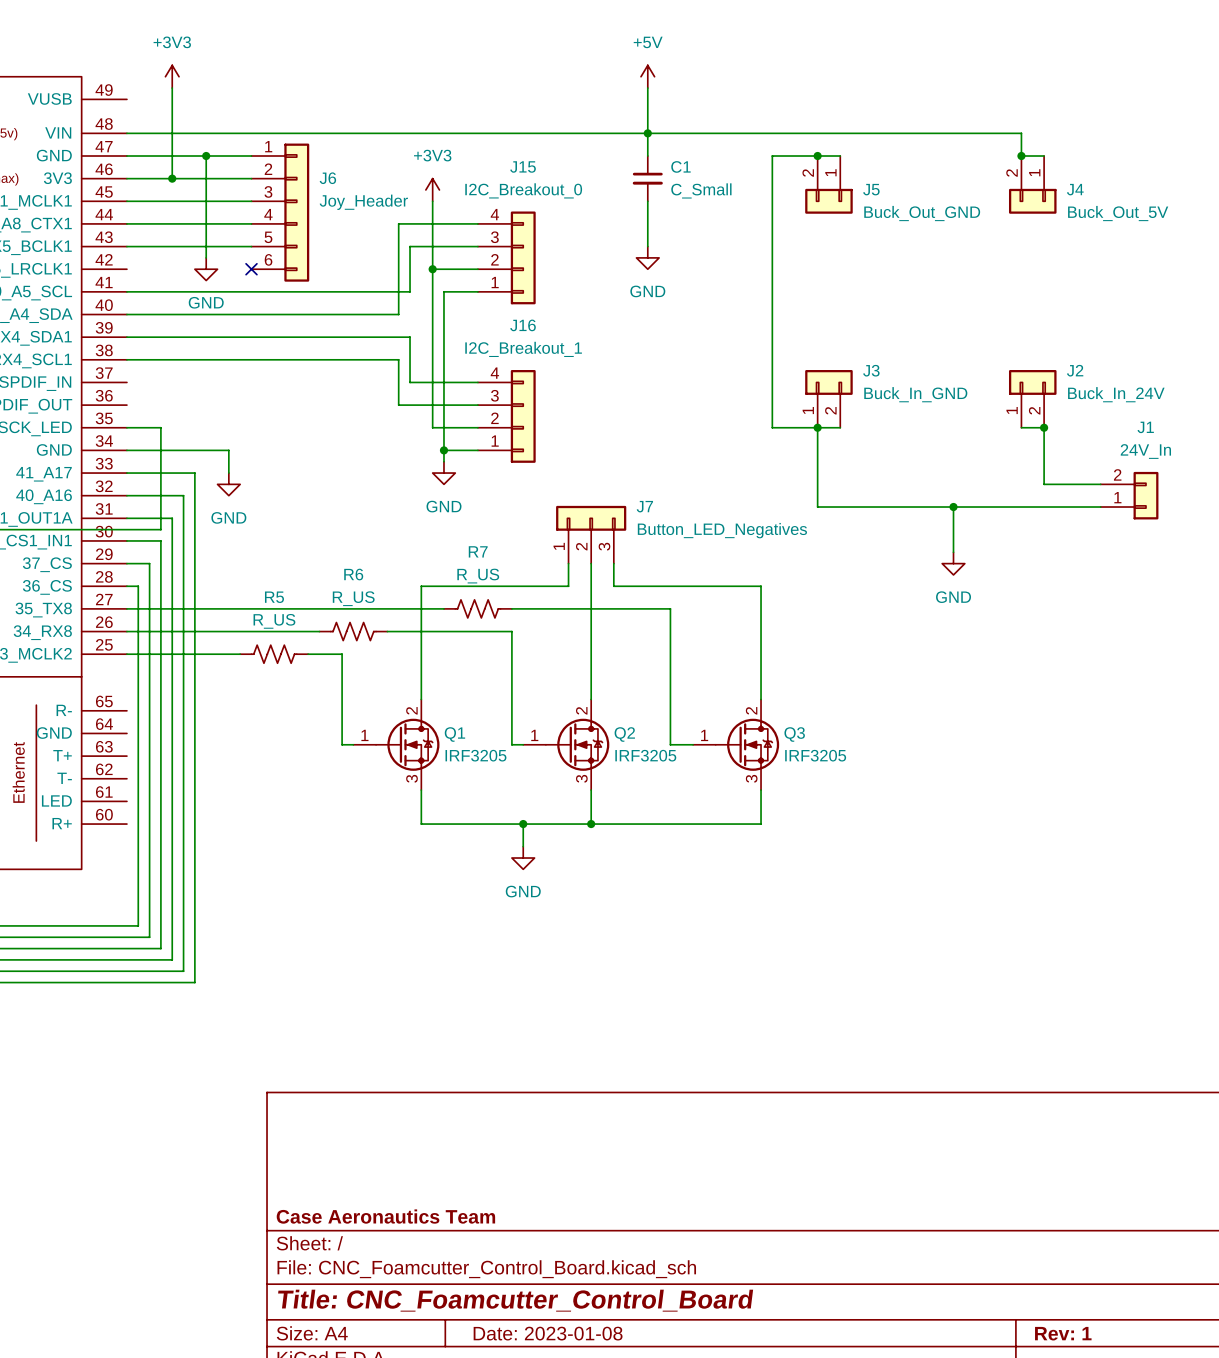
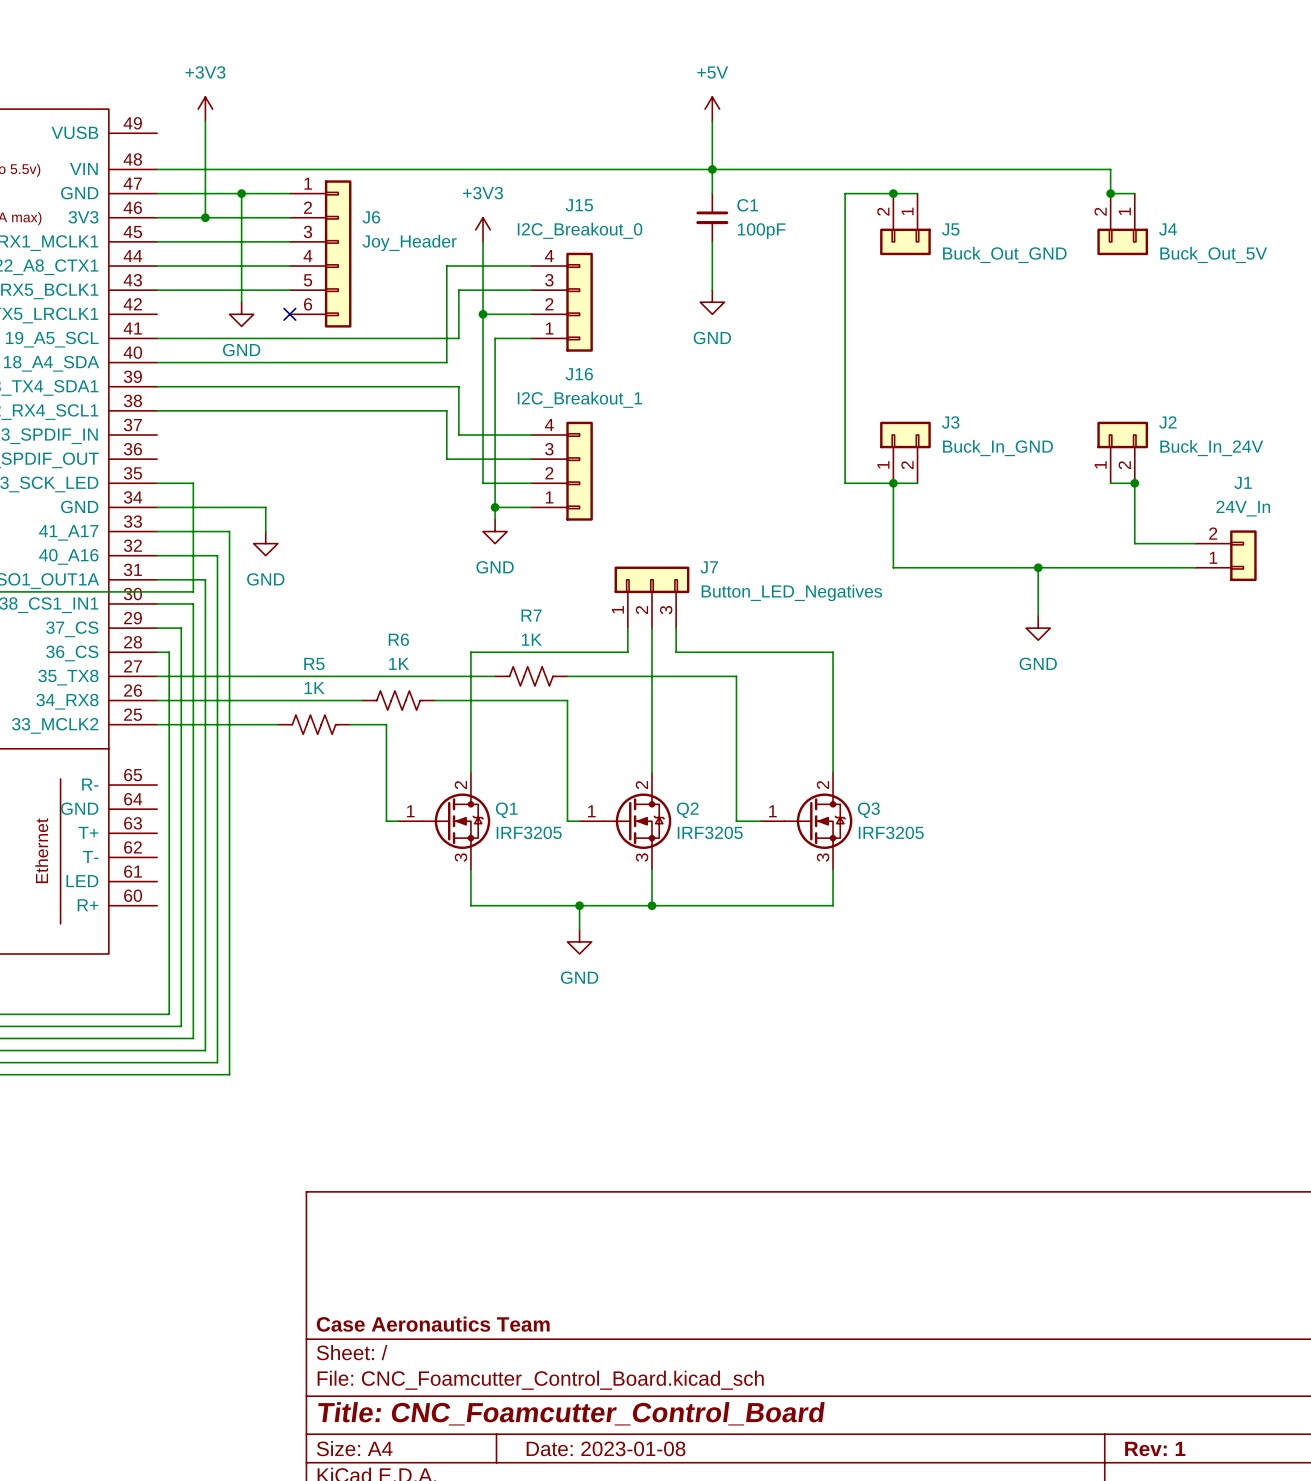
C1 value: C_Small (701, 190) -> 100pF (761, 231)
R7 value: R_US (478, 576) -> 1K (531, 639)
R6 value: R_US (353, 598) -> 1K (399, 663)
R5 value: R_US (274, 621) -> 1K (314, 688)

